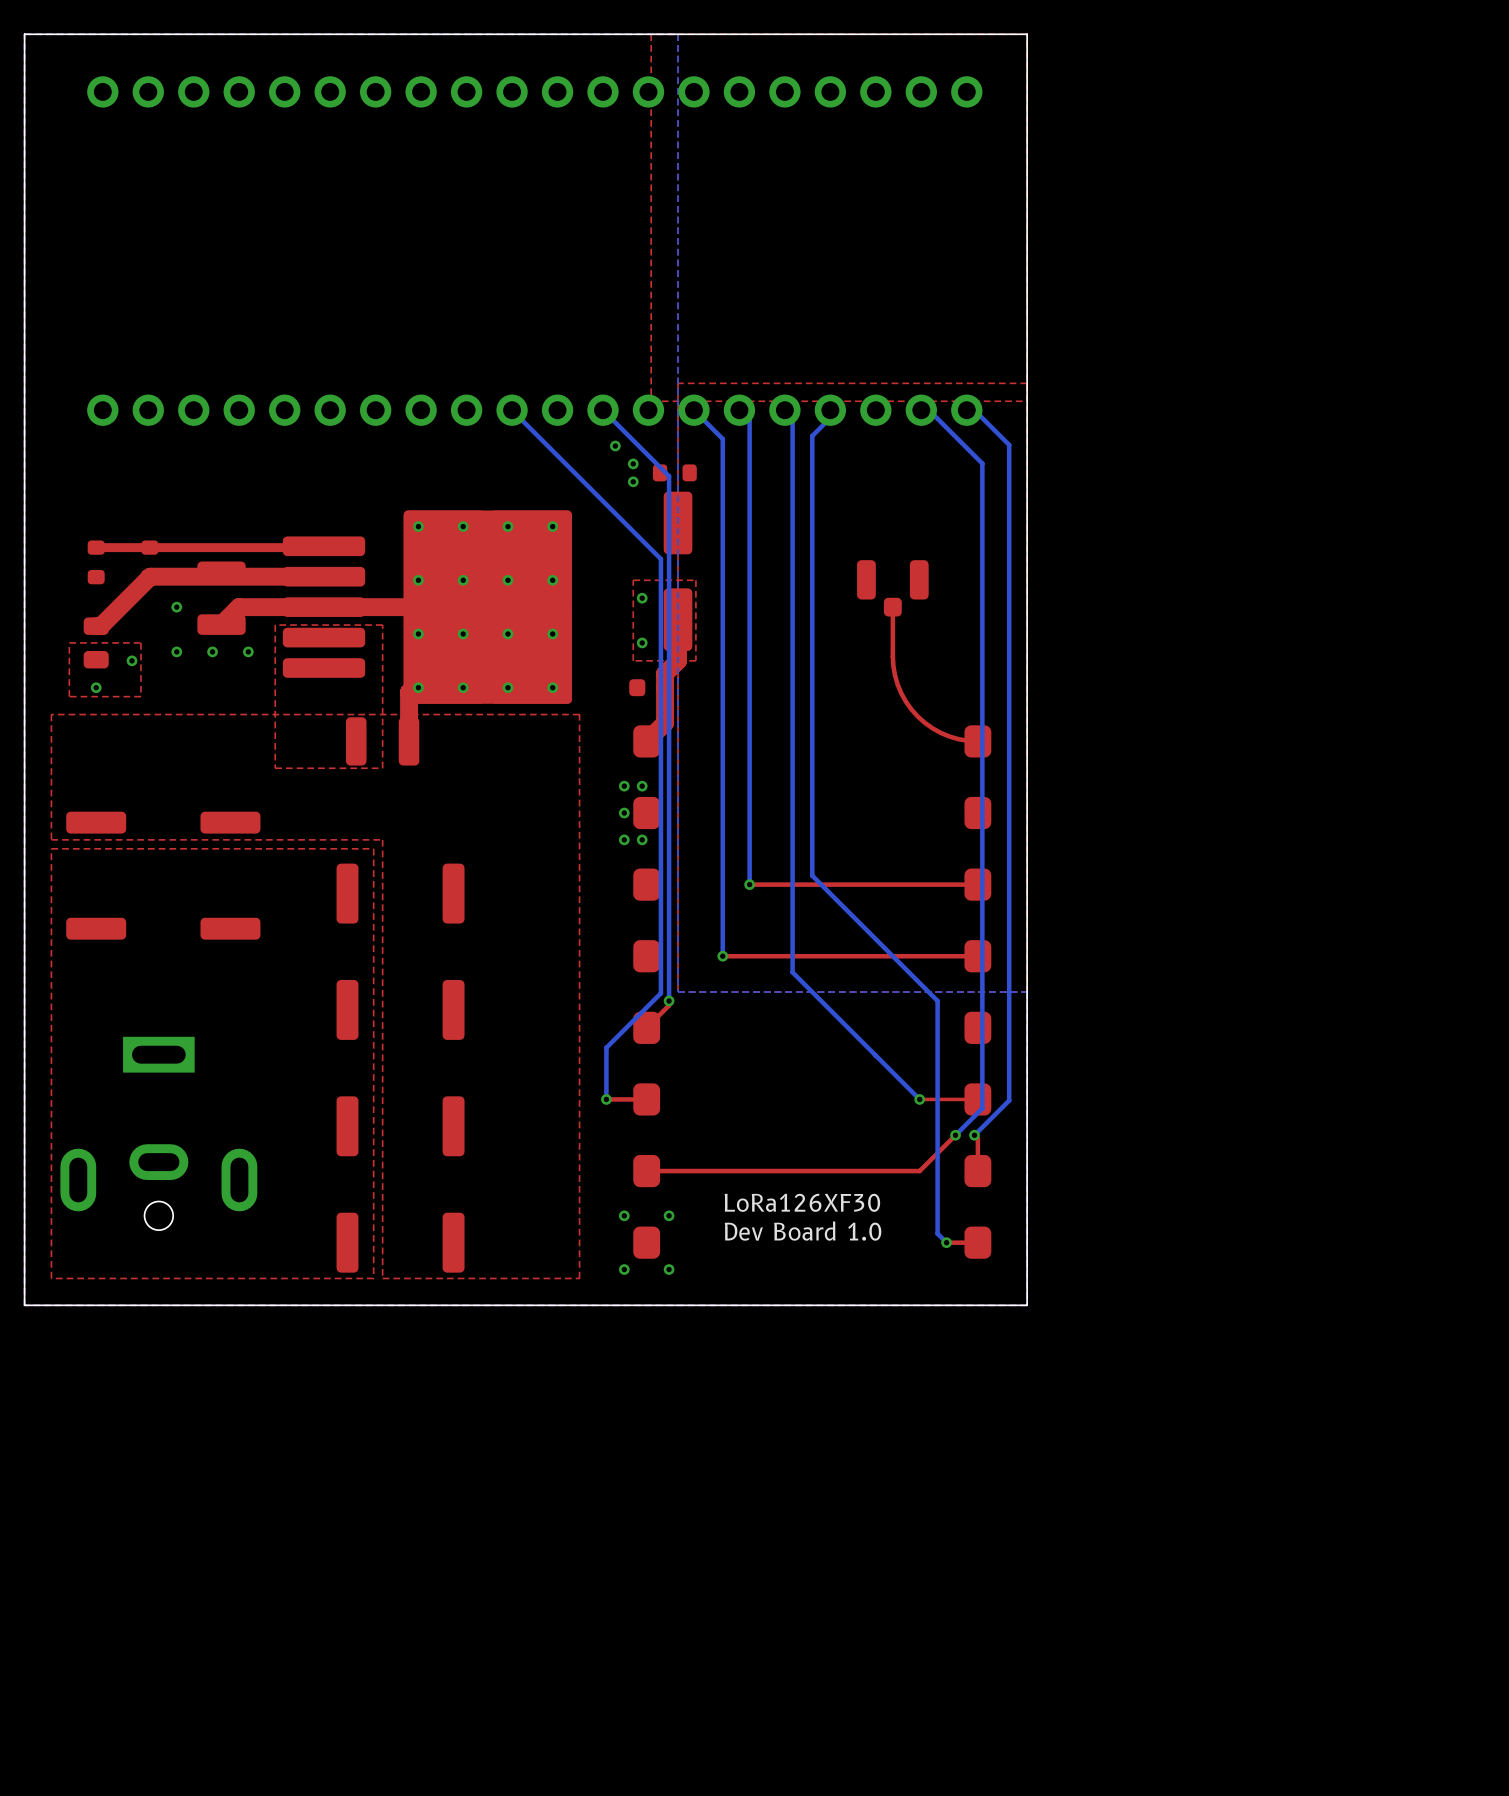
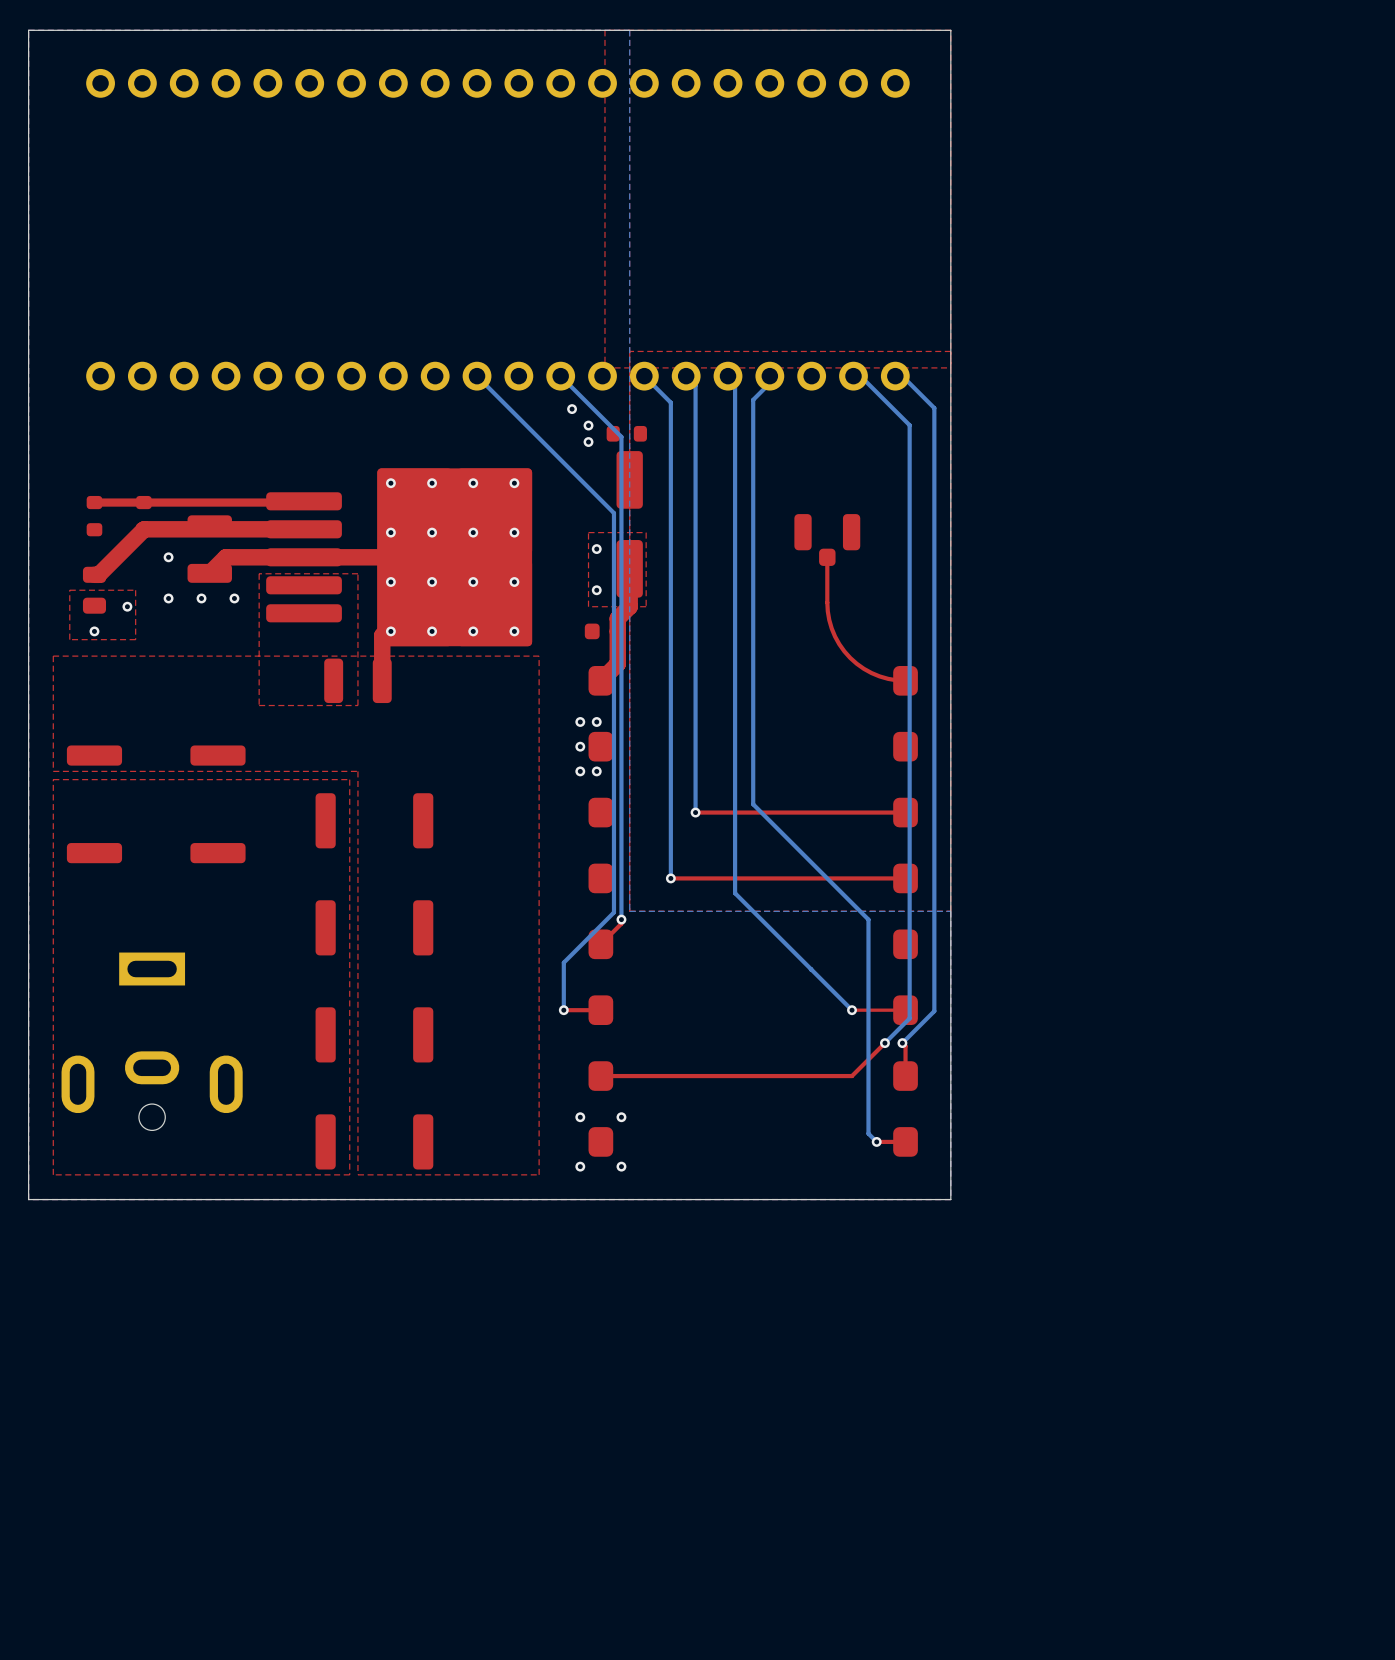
text: LoRa126XF30 (802, 1202) -> none
text: Dev Board 1.0 (803, 1231) -> none

